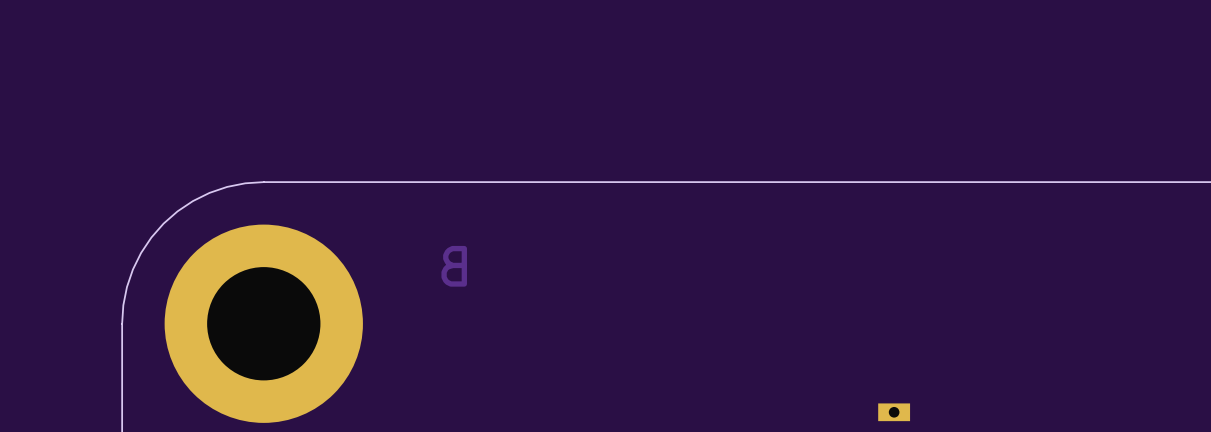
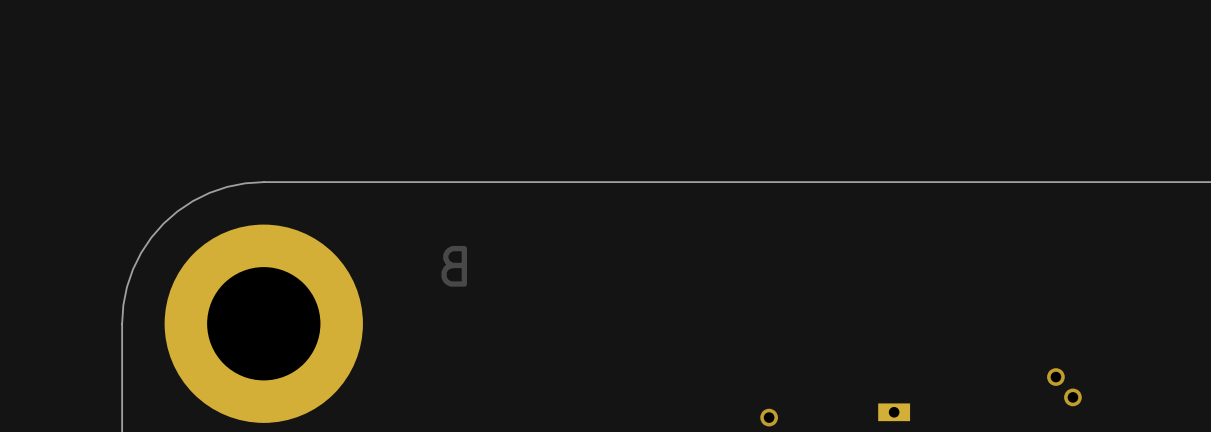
via: none -> (1055, 377)
via: none -> (1072, 397)
via: none -> (769, 417)

